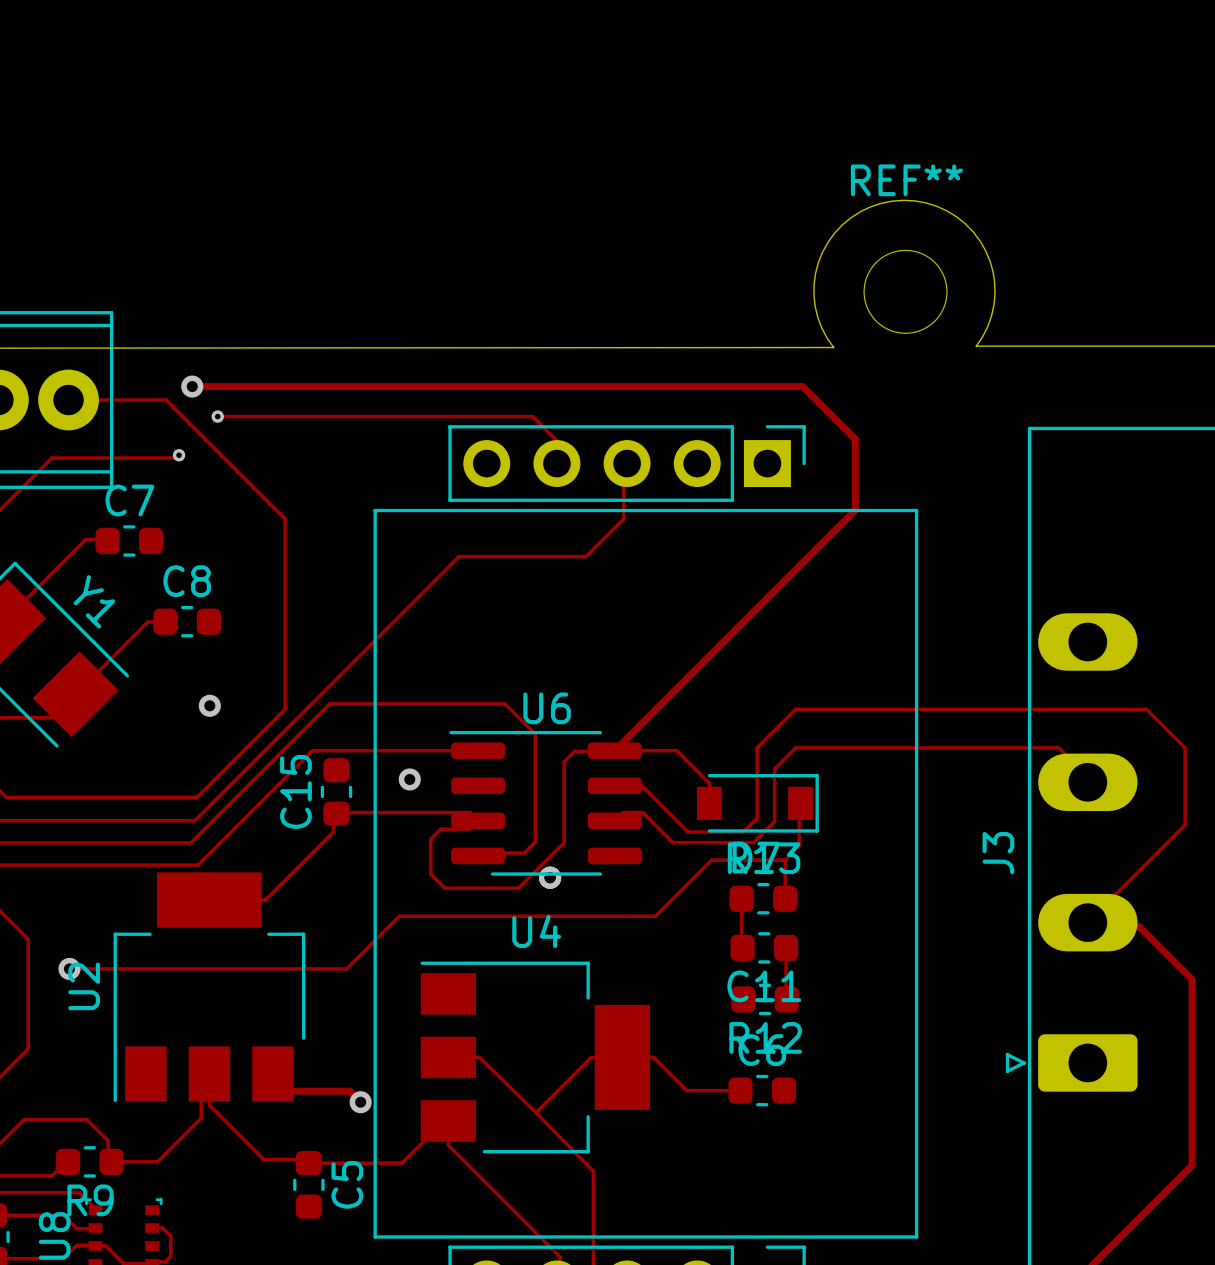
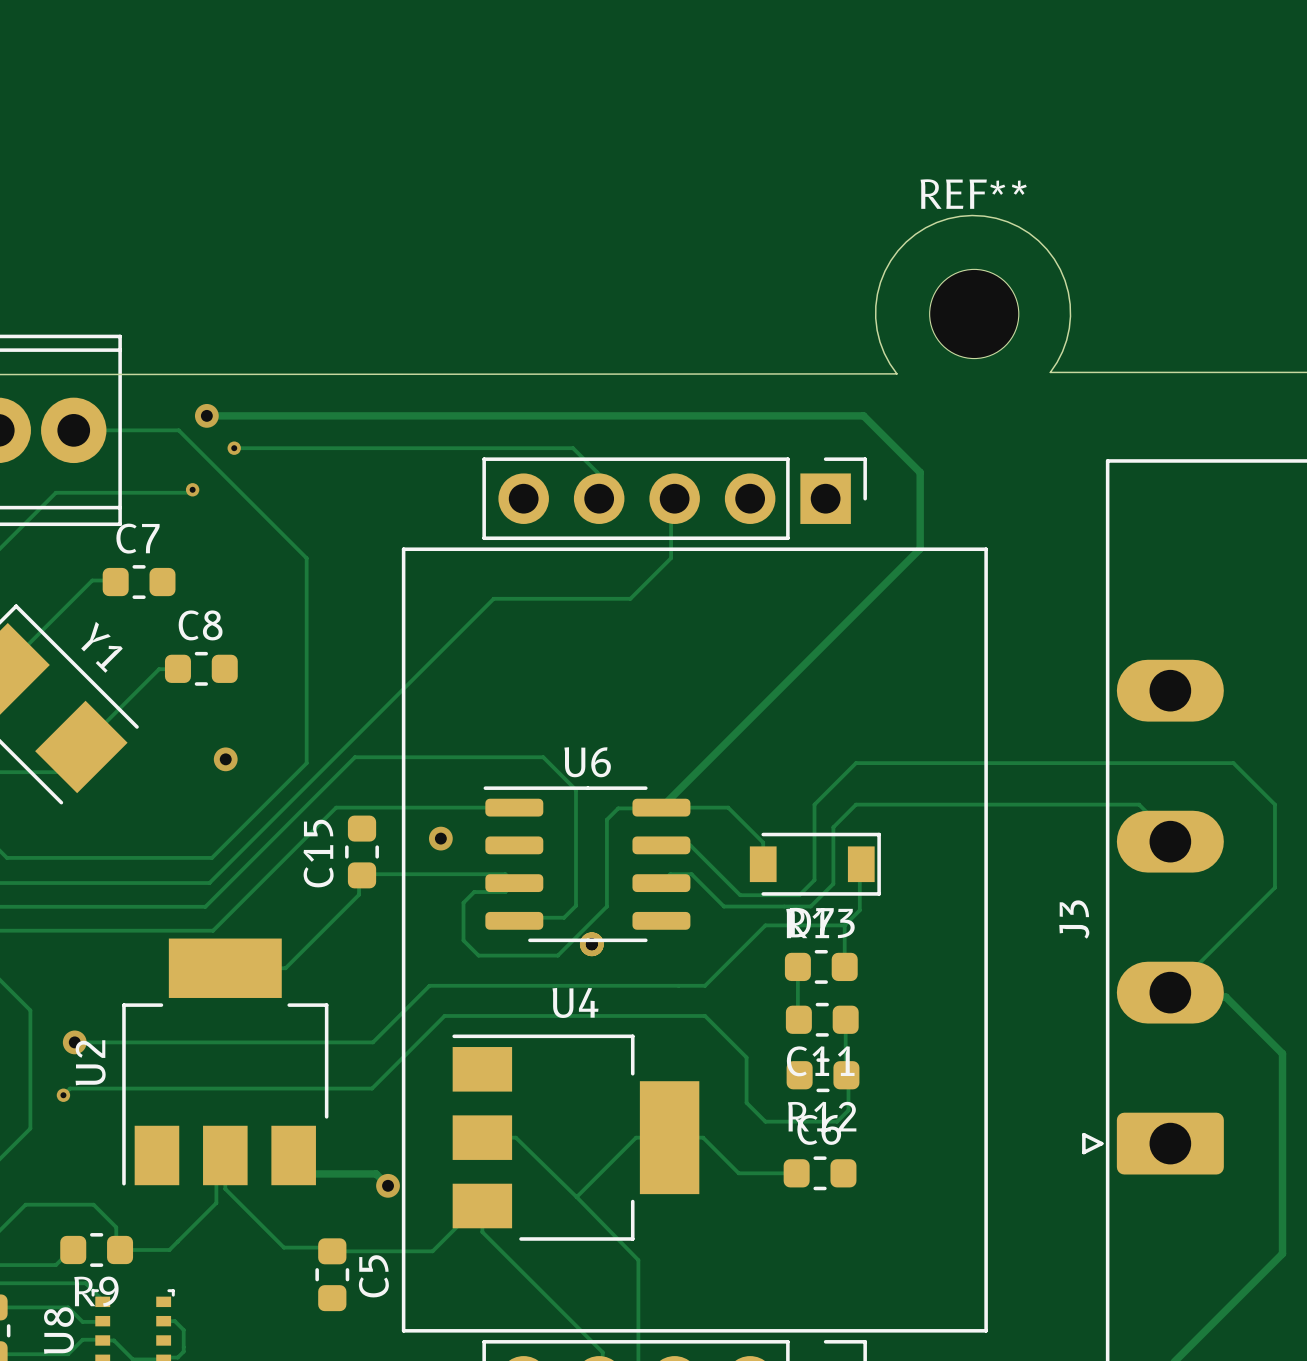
track: none -> (848, 1076) (848, 1110) (837, 1121) (765, 1121) (746, 1102) (746, 1057) (705, 1015) (444, 1015) (372, 1088) (70, 1088) (63, 1095)
via: none -> (63, 1095)

